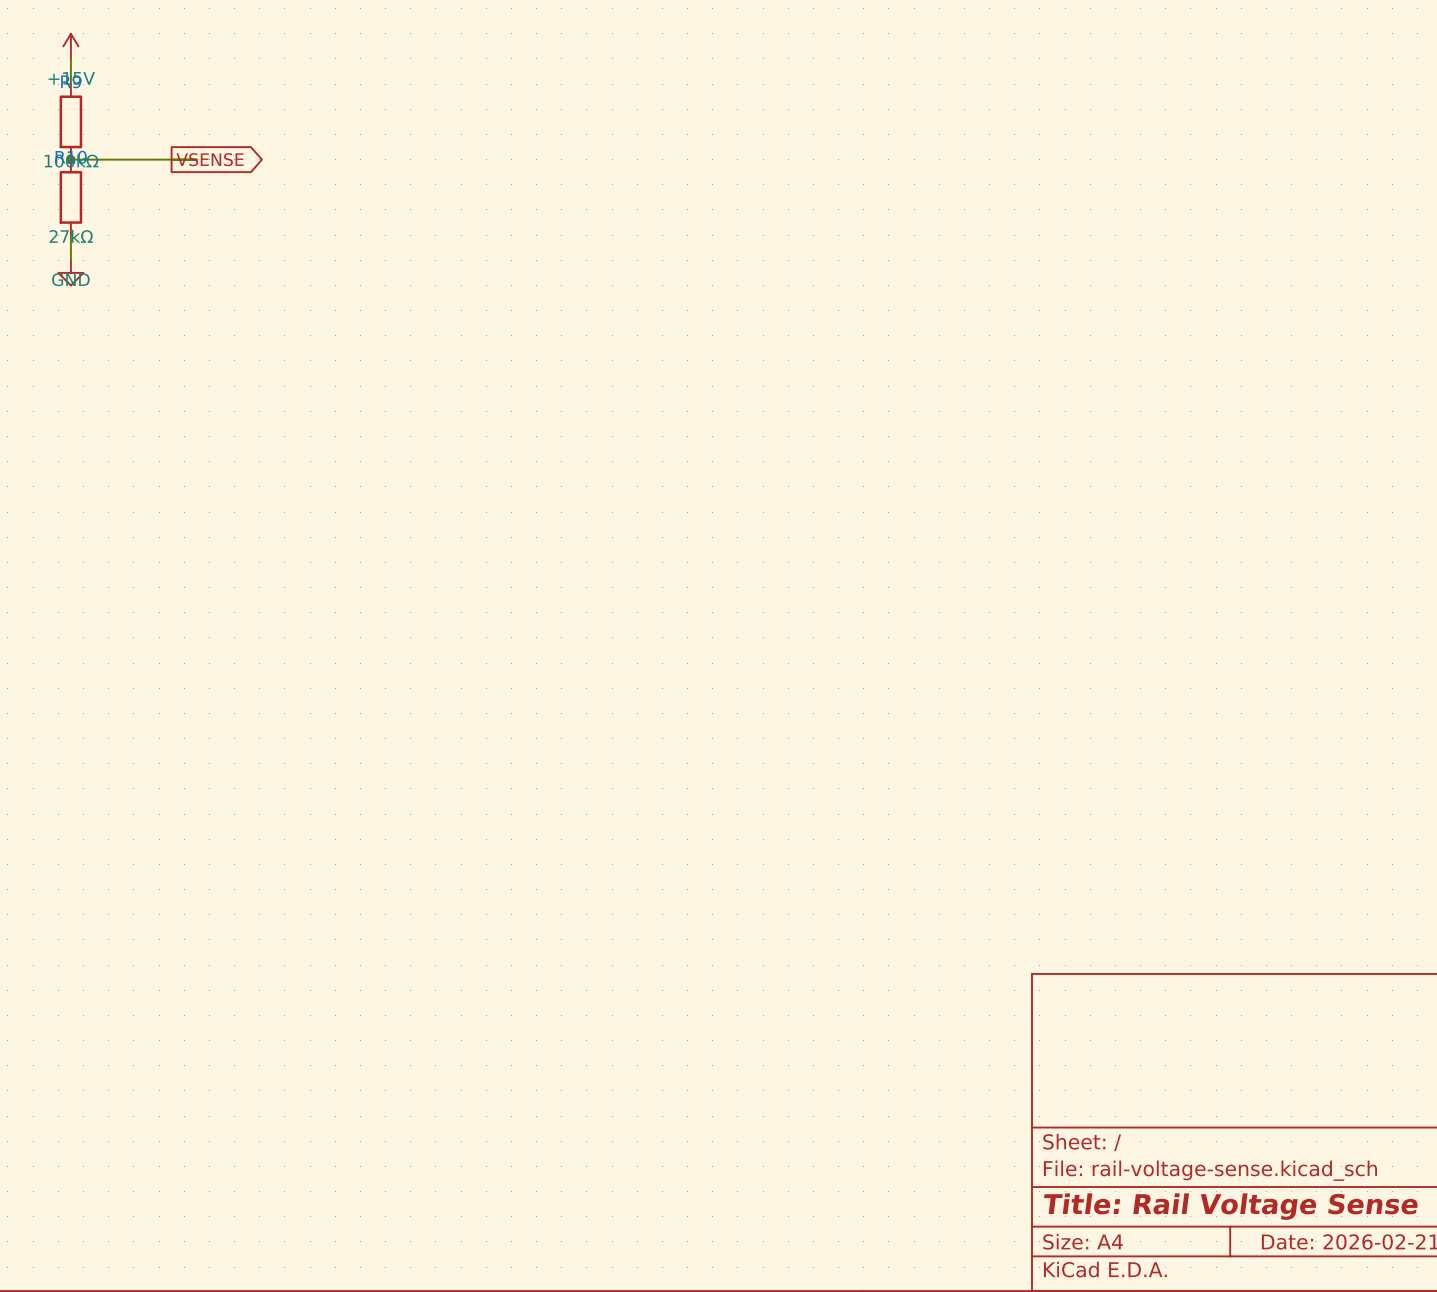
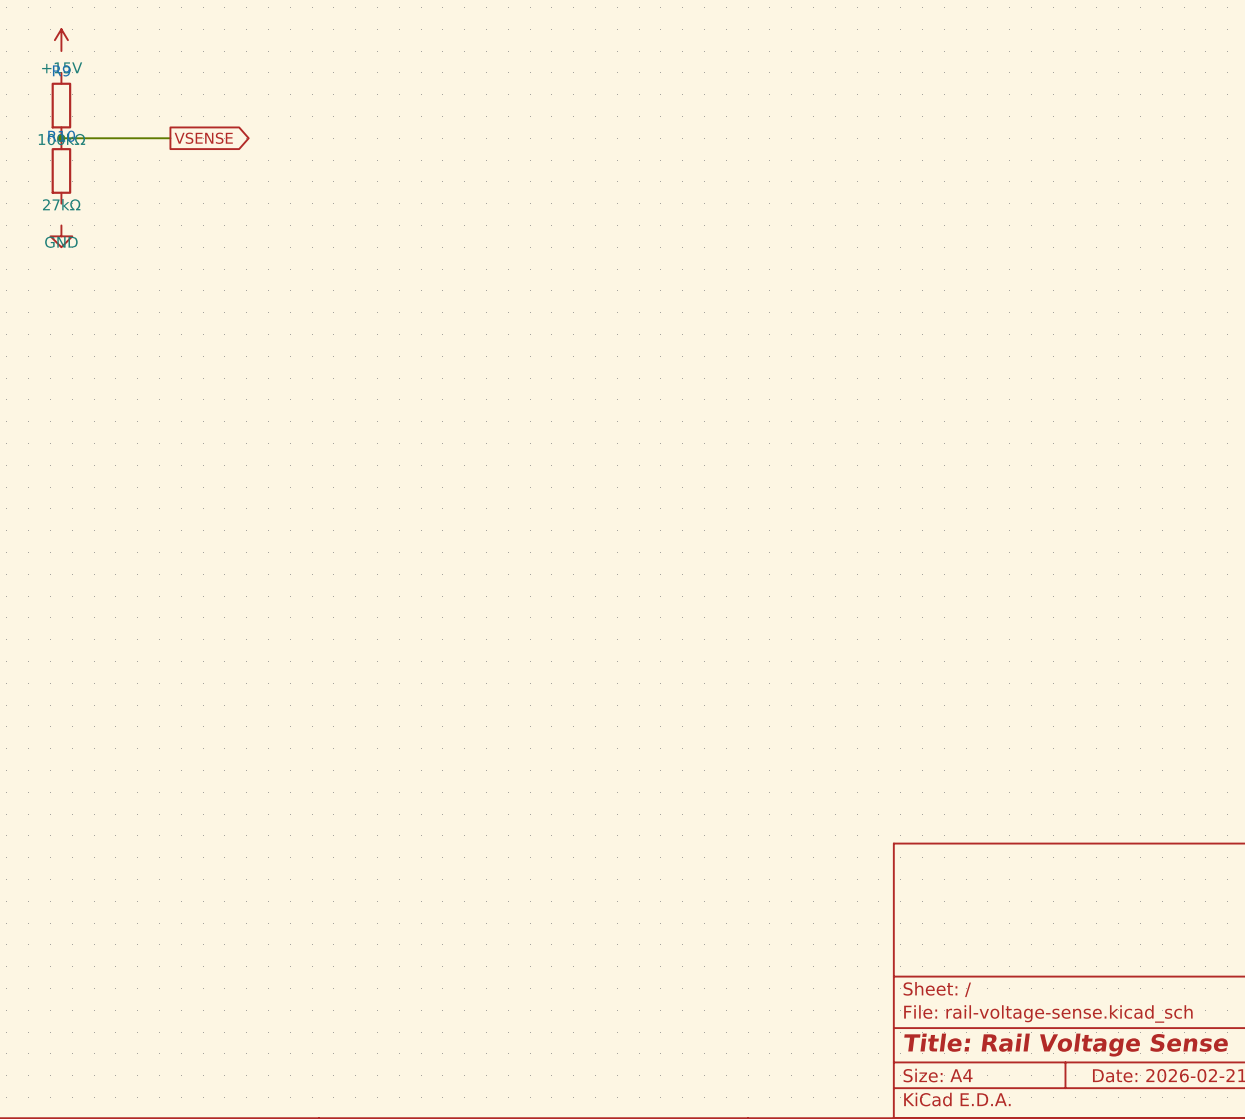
wire: (70, 58) (70, 84) -> none
global label position: VSENSE (210, 159) -> VSENSE (203, 138)
wire: (70, 235) (70, 260) -> none

